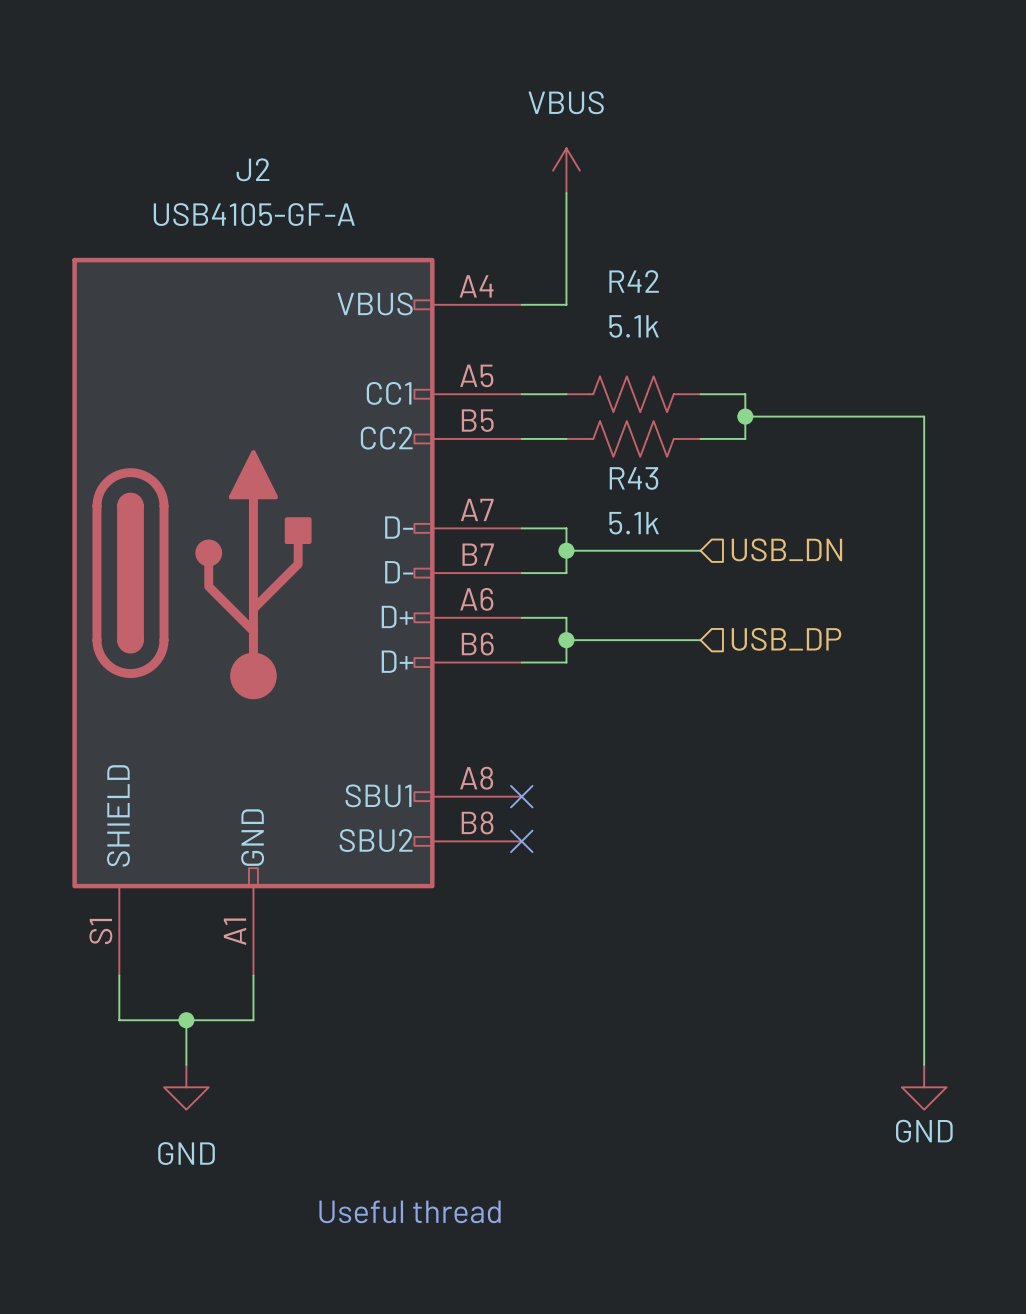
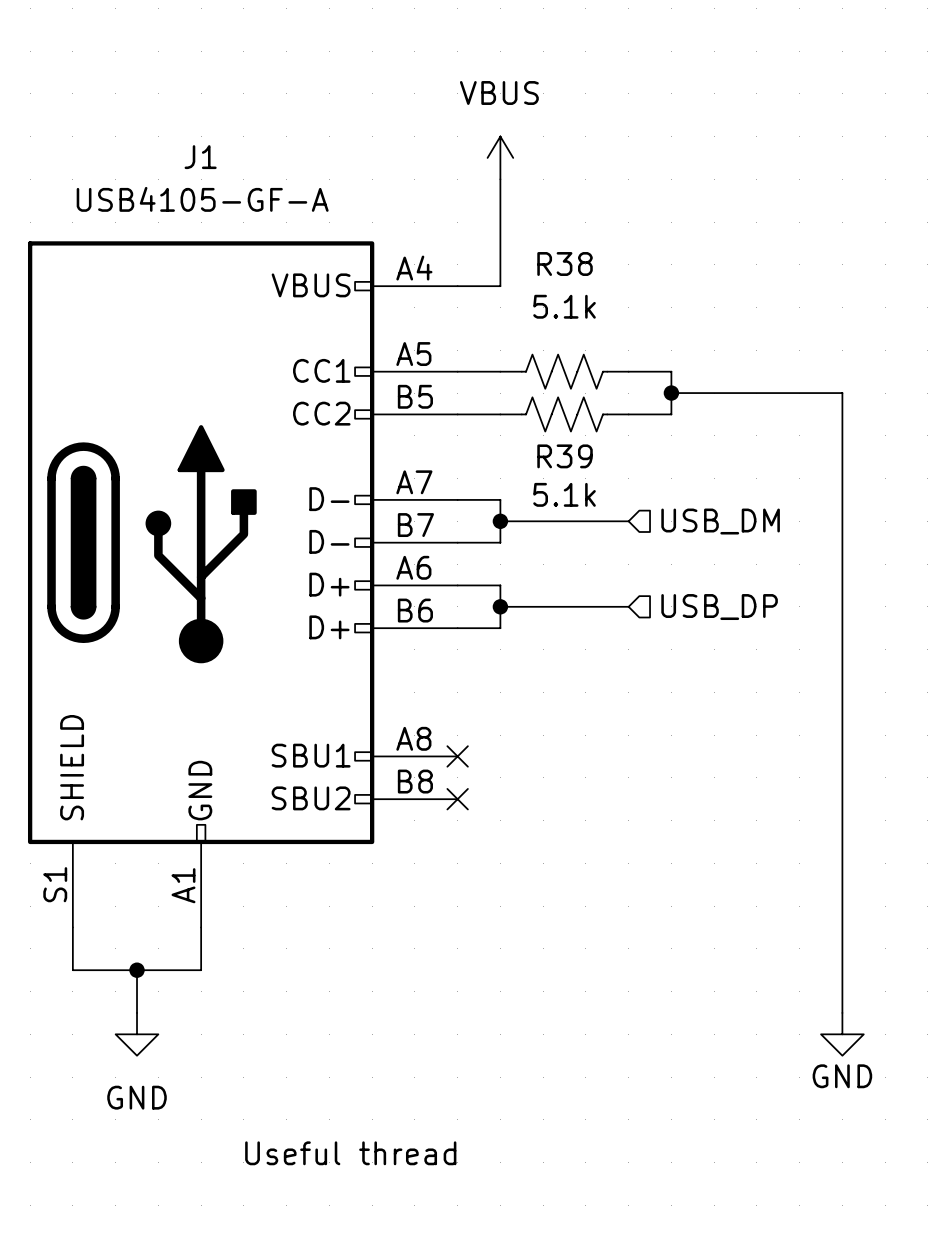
J2 name: J2 (252, 169) -> J1 (200, 157)
R42 name: R42 (634, 281) -> R38 (565, 264)
R43 name: R43 (633, 478) -> R39 (565, 456)
hierarchical label: USB_DN (786, 549) -> USB_DM (720, 521)

